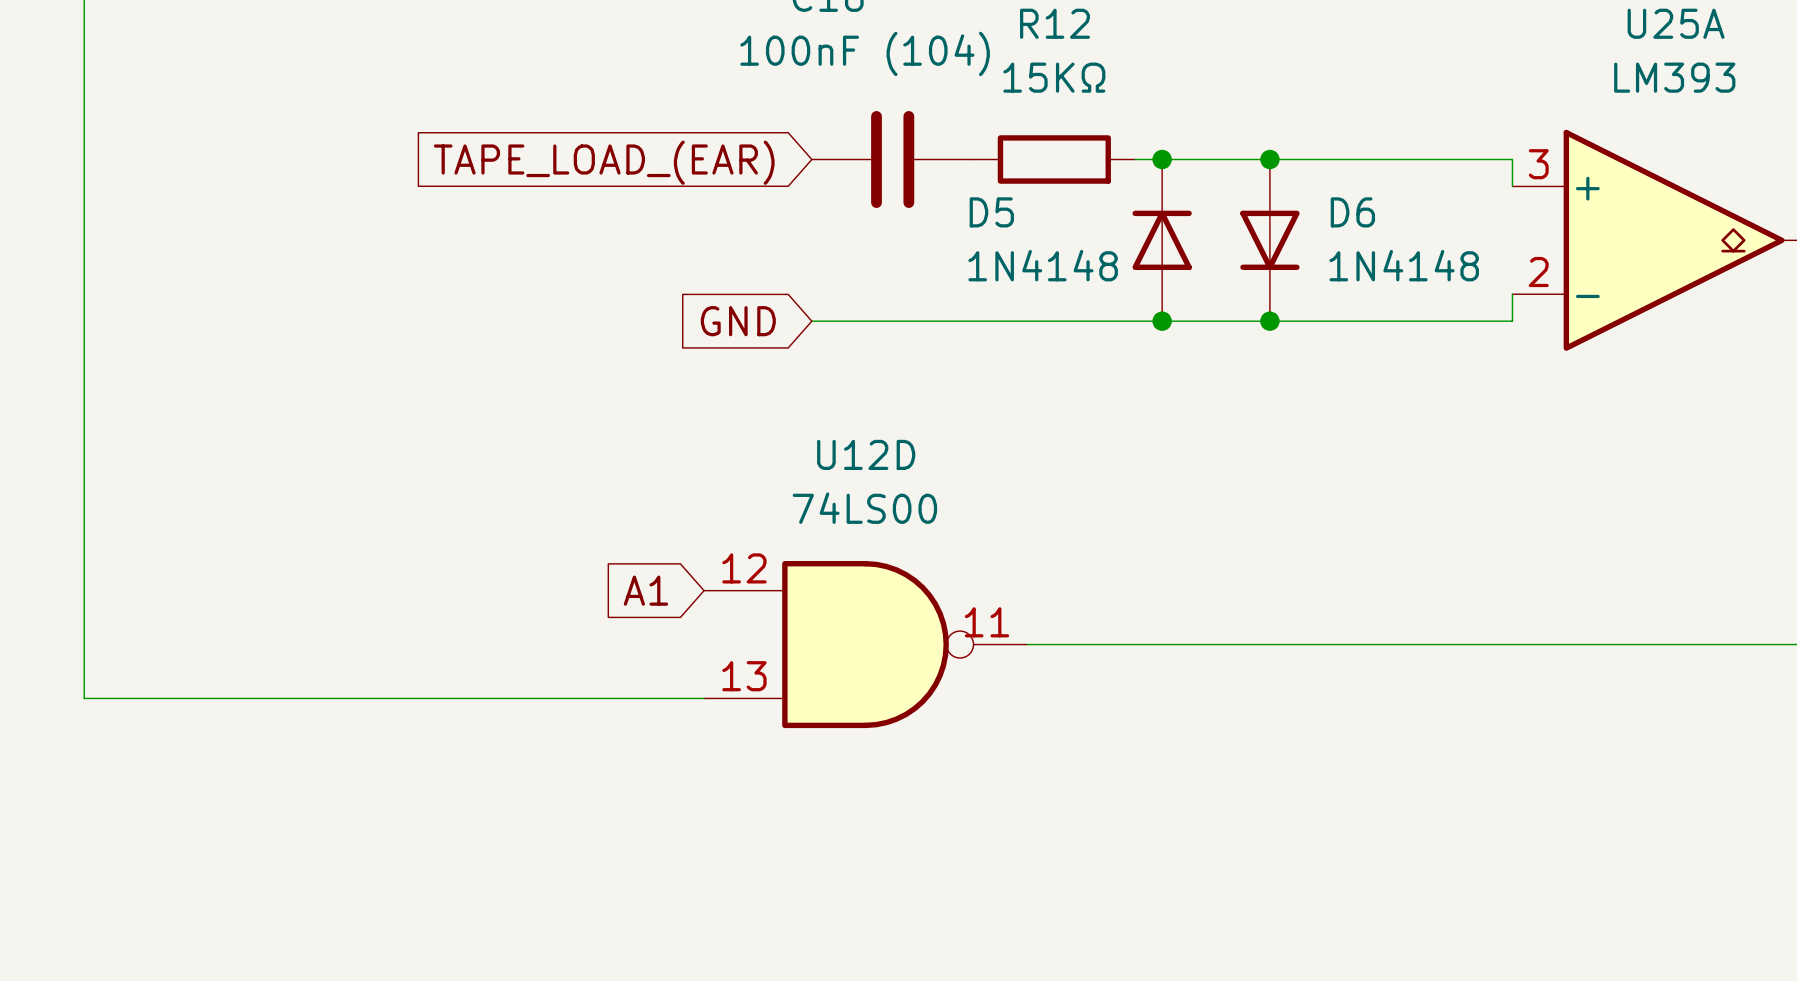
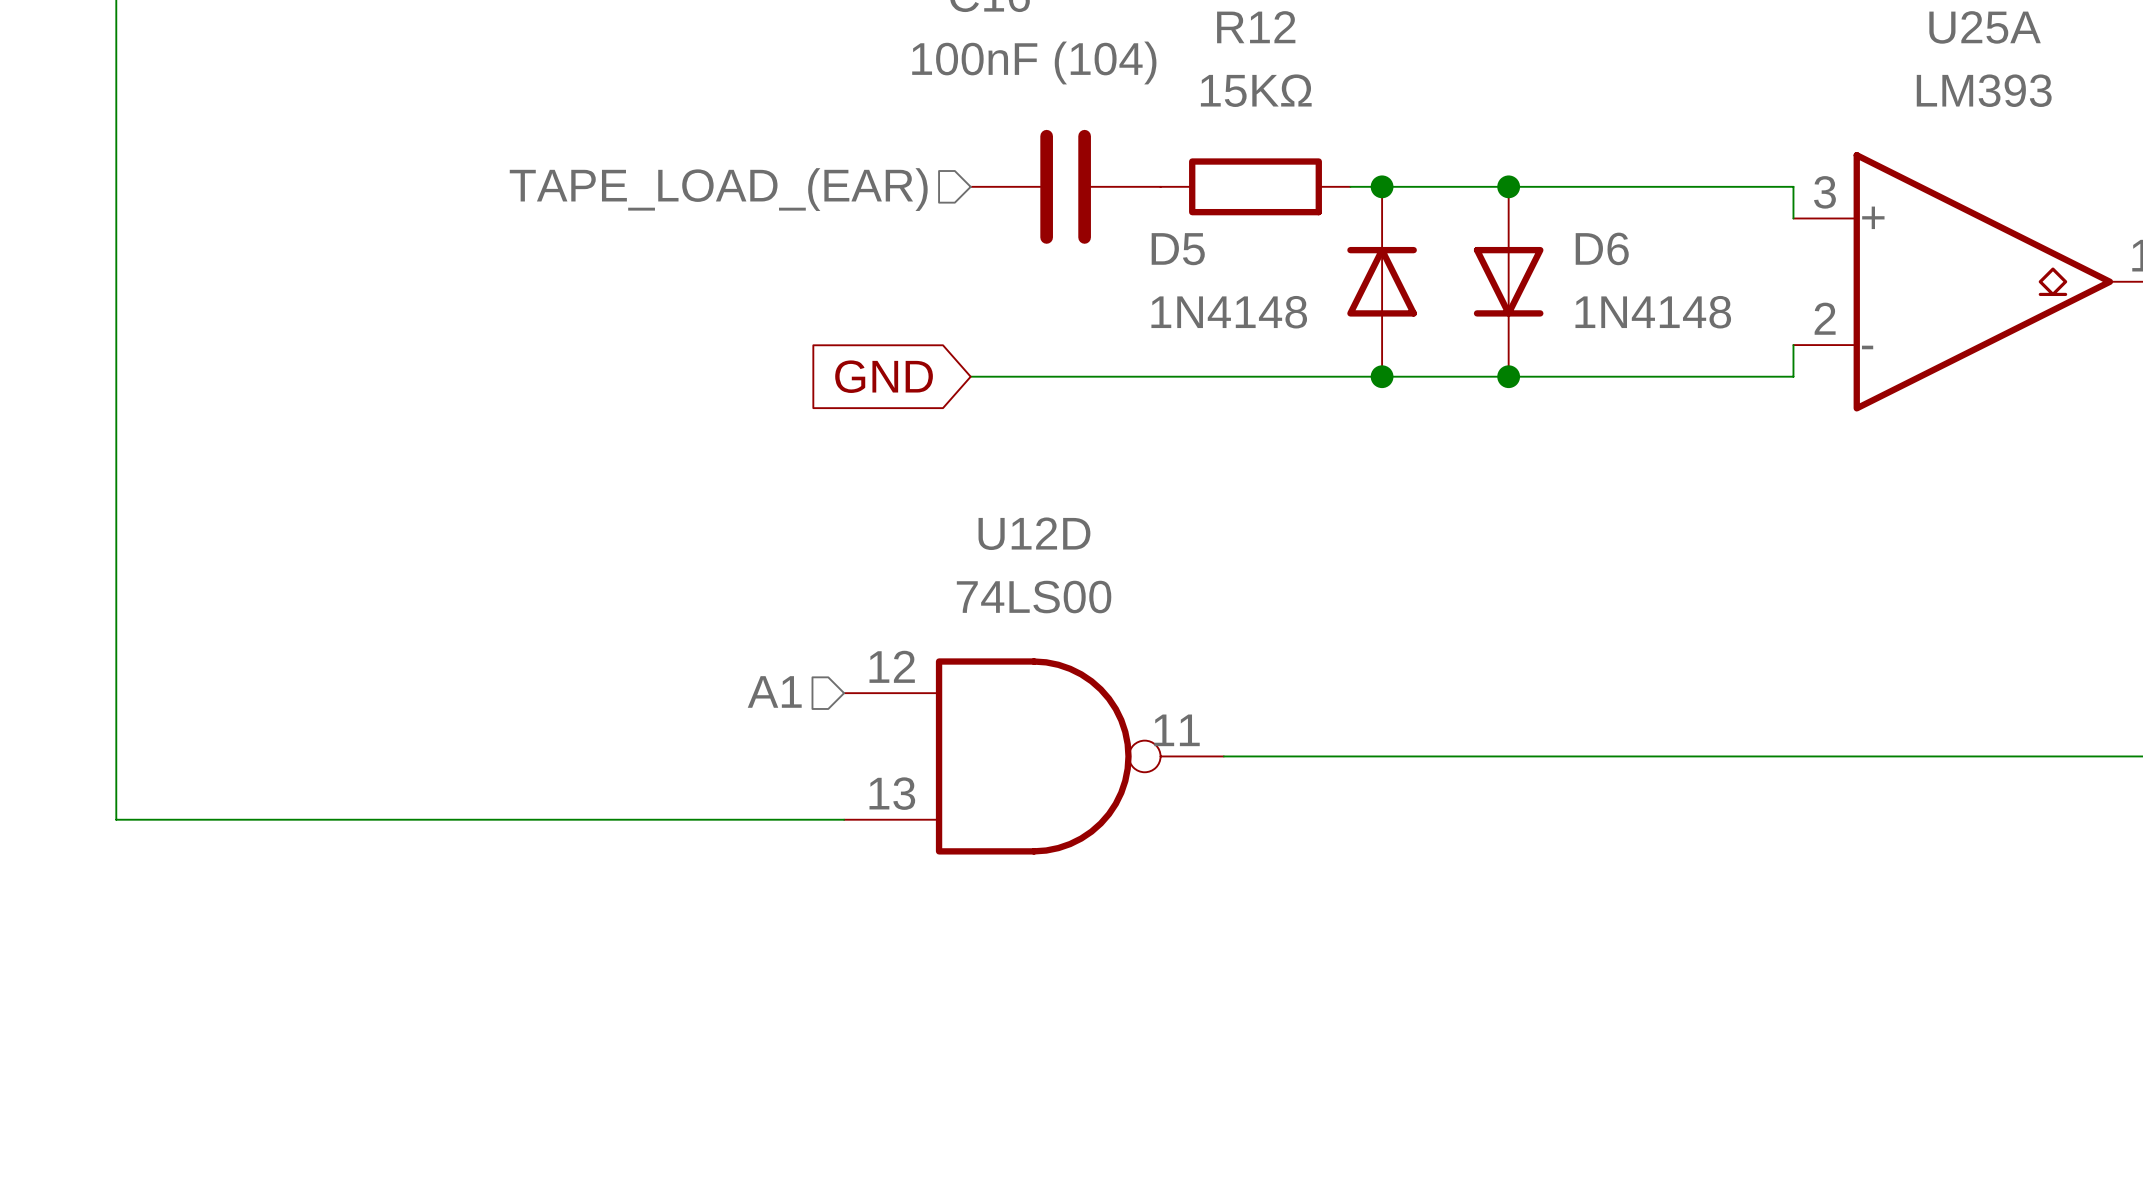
hierarchical label: none -> TAPE_LOAD_(EAR) (718, 189)
global label: TAPE_LOAD_(EAR) (604, 162) -> none
hierarchical label: none -> A1 (774, 691)
global label: A1 (645, 590) -> none

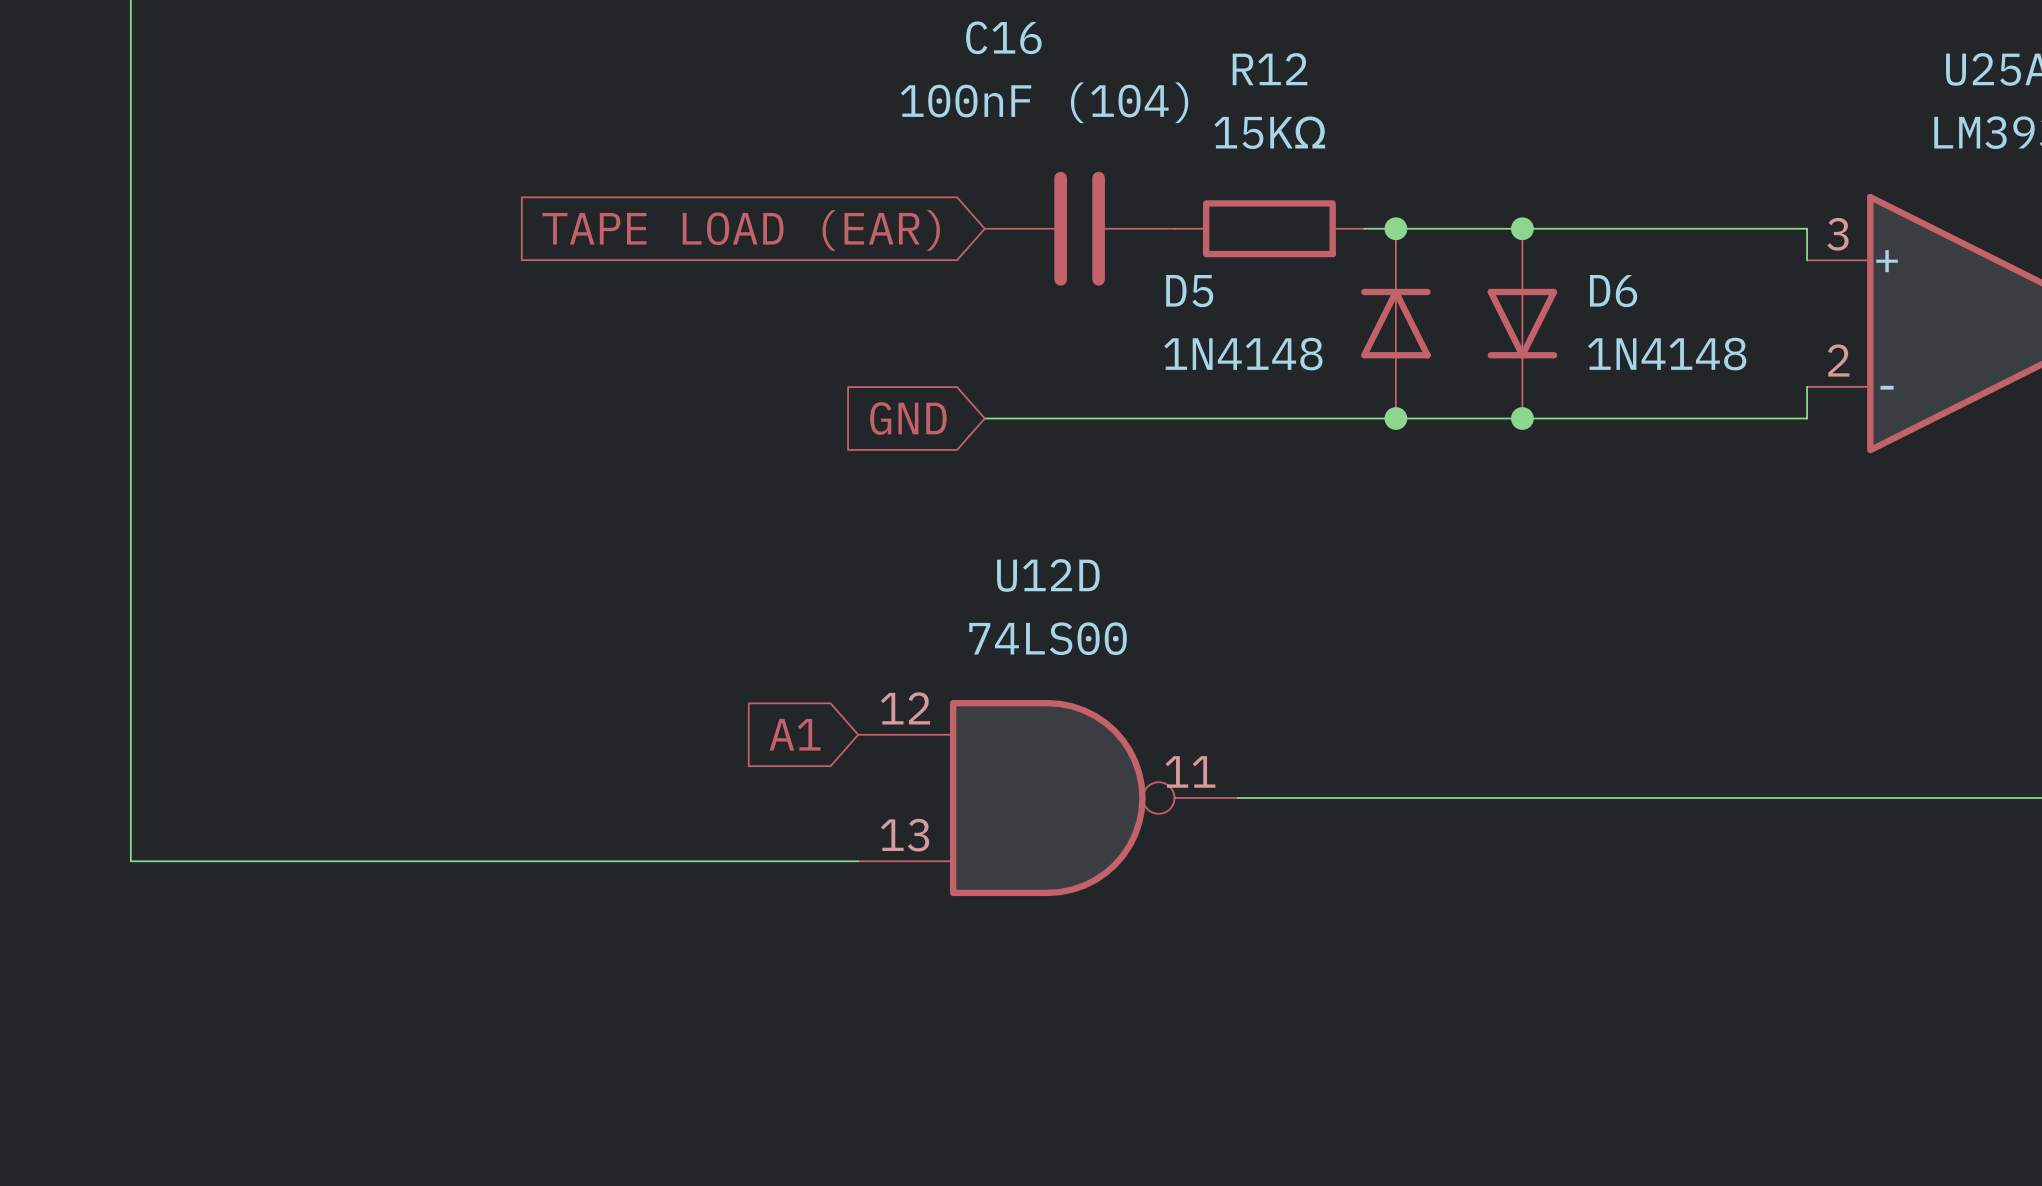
hierarchical label: TAPE_LOAD_(EAR) (718, 189) -> none
global label: none -> TAPE LOAD (EAR) (741, 230)
hierarchical label: A1 (774, 691) -> none
global label: none -> A1 (795, 734)

